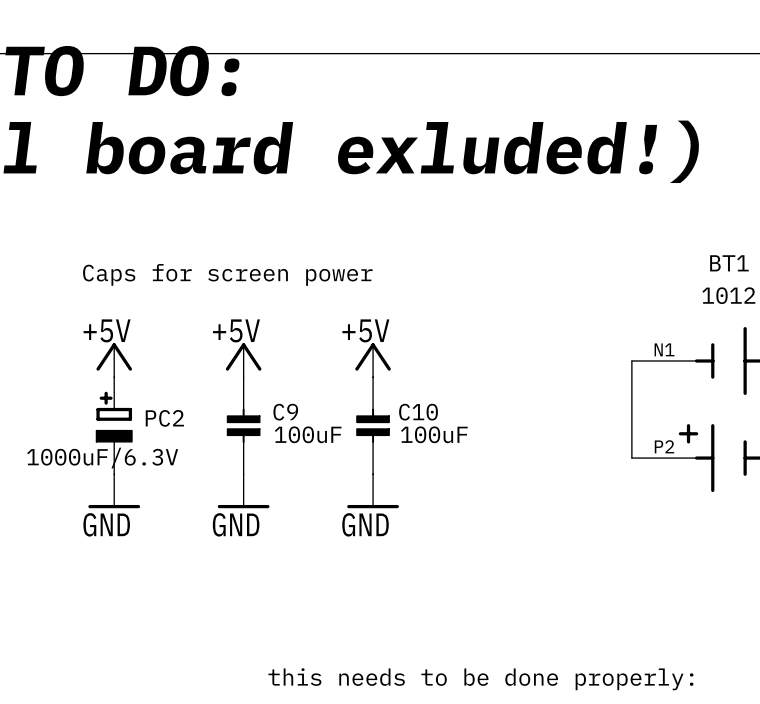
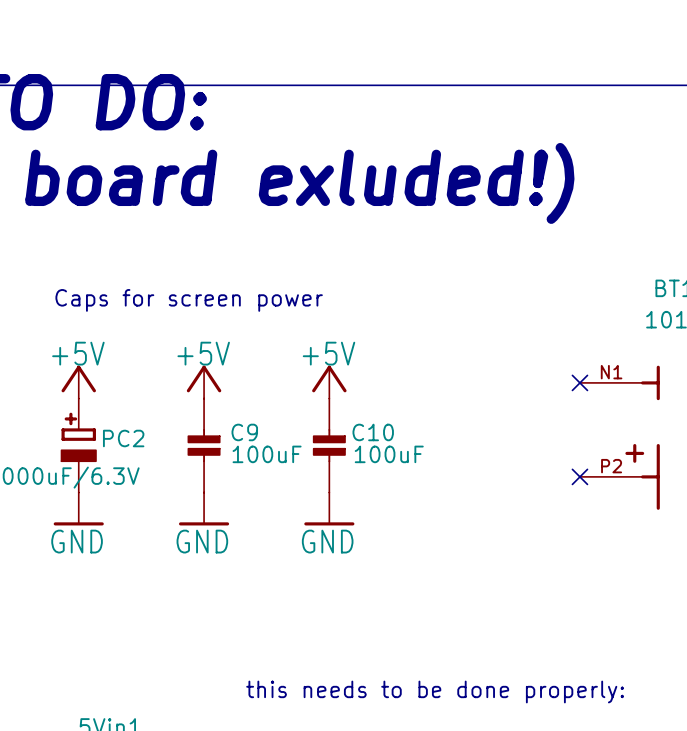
wire: (631, 360) (631, 458) -> none
no-connect mark: none -> (579, 382)
no-connect mark: none -> (579, 476)

